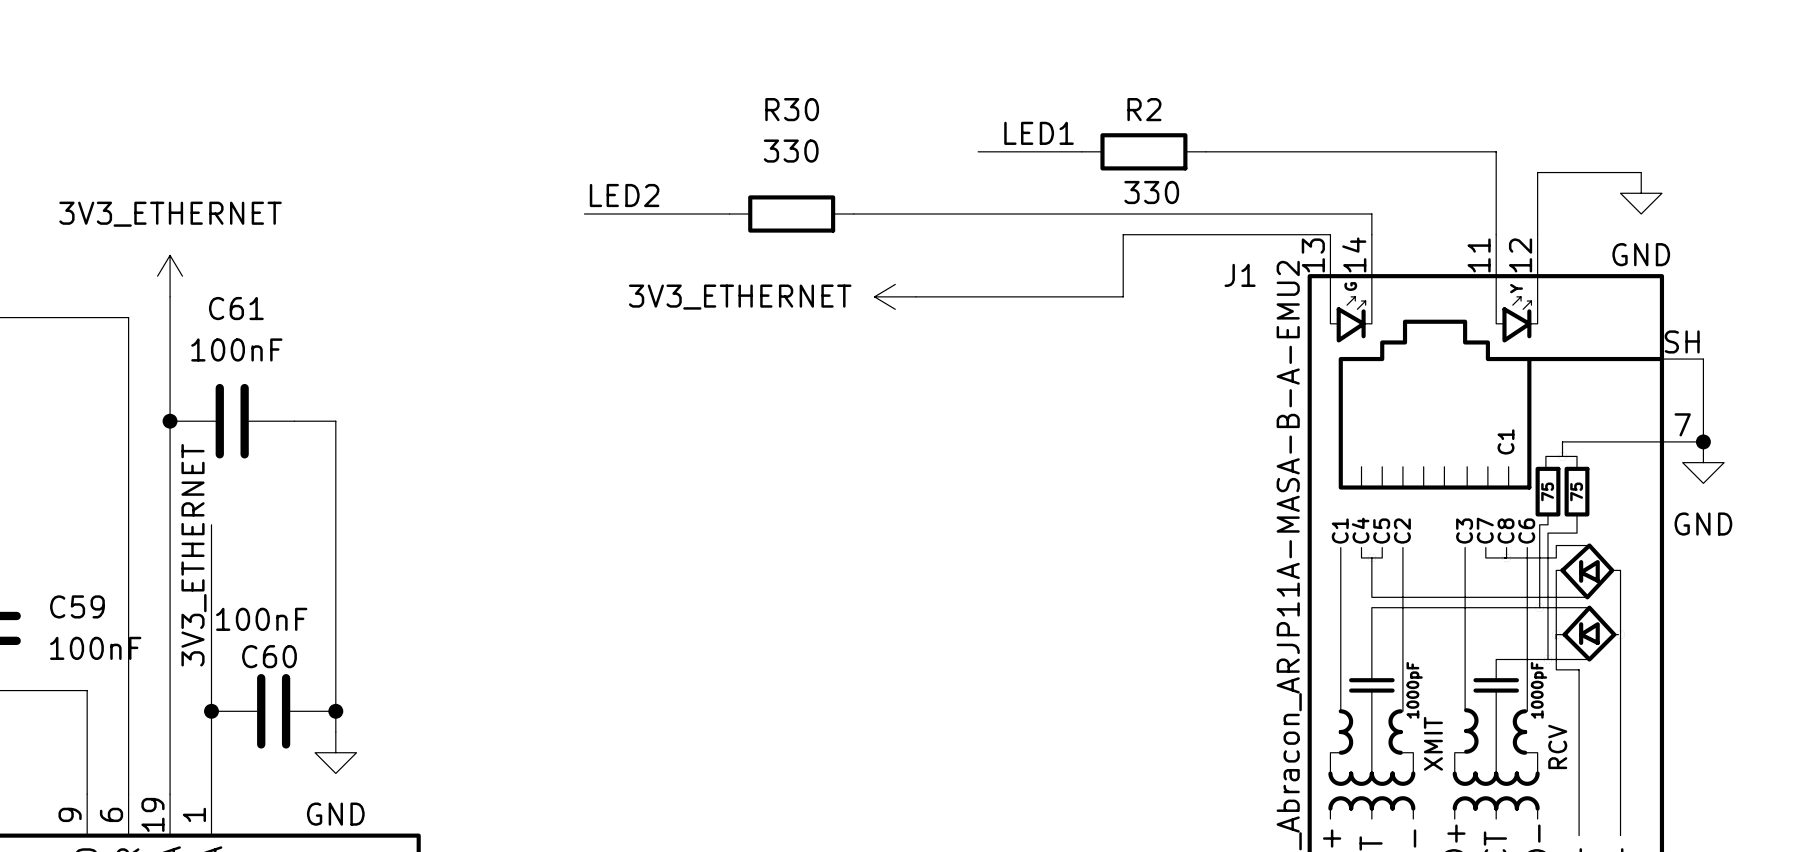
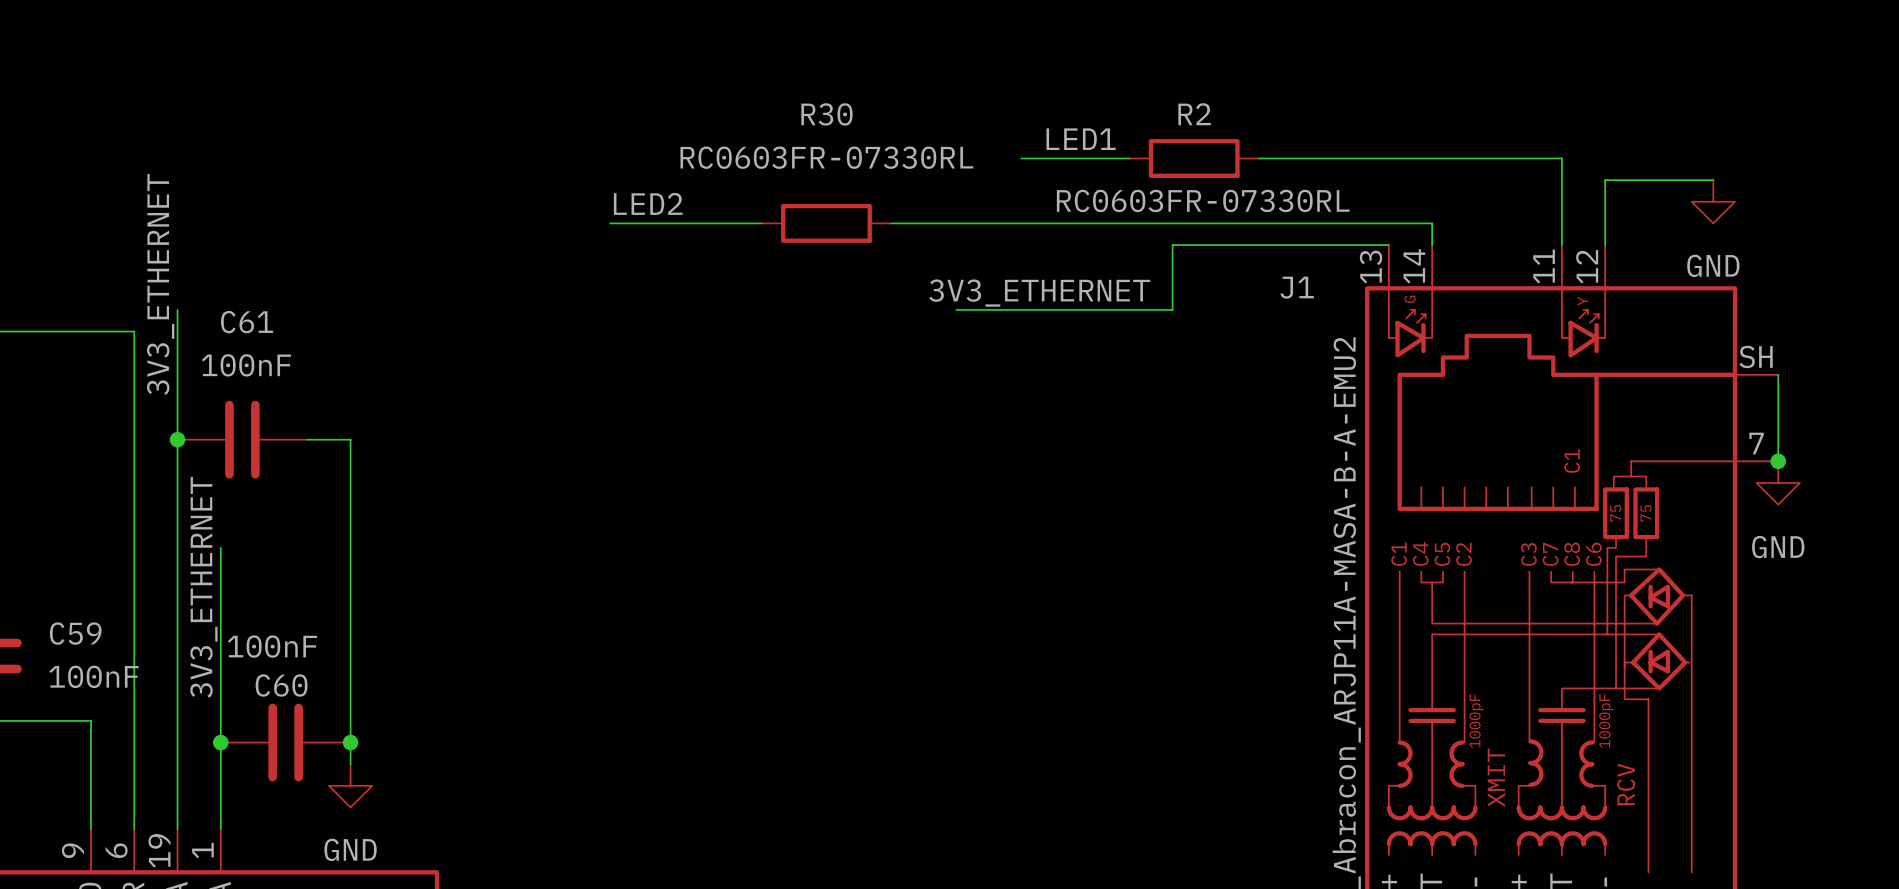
R30 value: 330 (791, 151) -> RC0603FR-07330RL (826, 157)
R2 value: 330 (1151, 192) -> RC0603FR-07330RL (1203, 200)
label: none -> 3V3_ETHERNET (160, 284)
power symbol: 3V3_ETHERNET (170, 276) -> none
label: none -> 3V3_ETHERNET (1039, 293)
power symbol: 3V3_ETHERNET (895, 296) -> none

